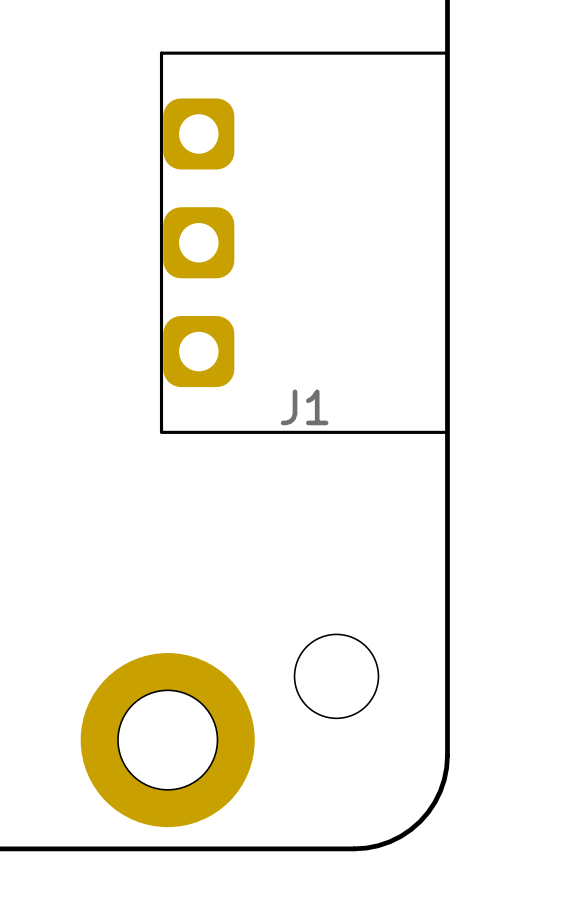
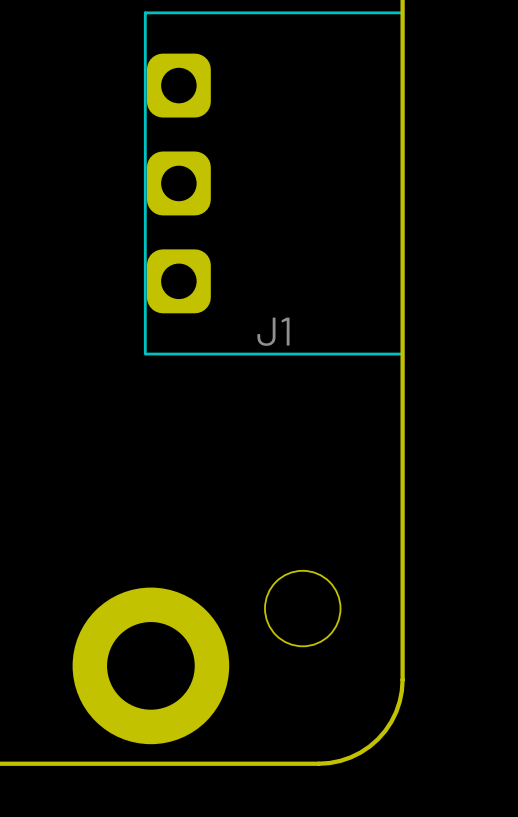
J1 position: (304, 242) -> (273, 183)

